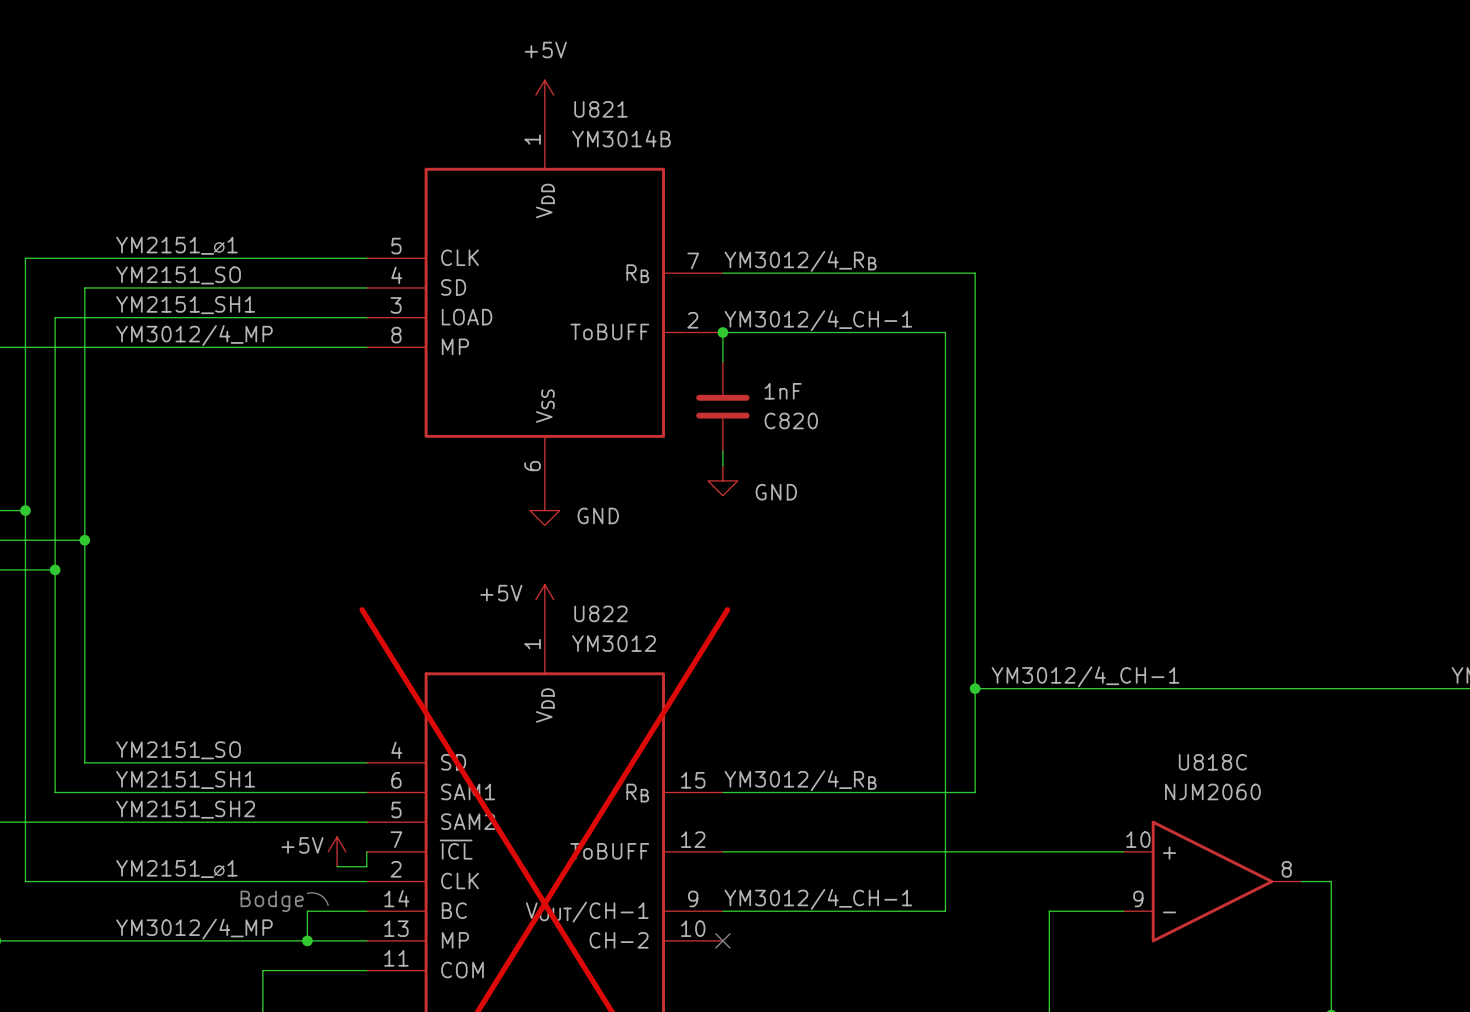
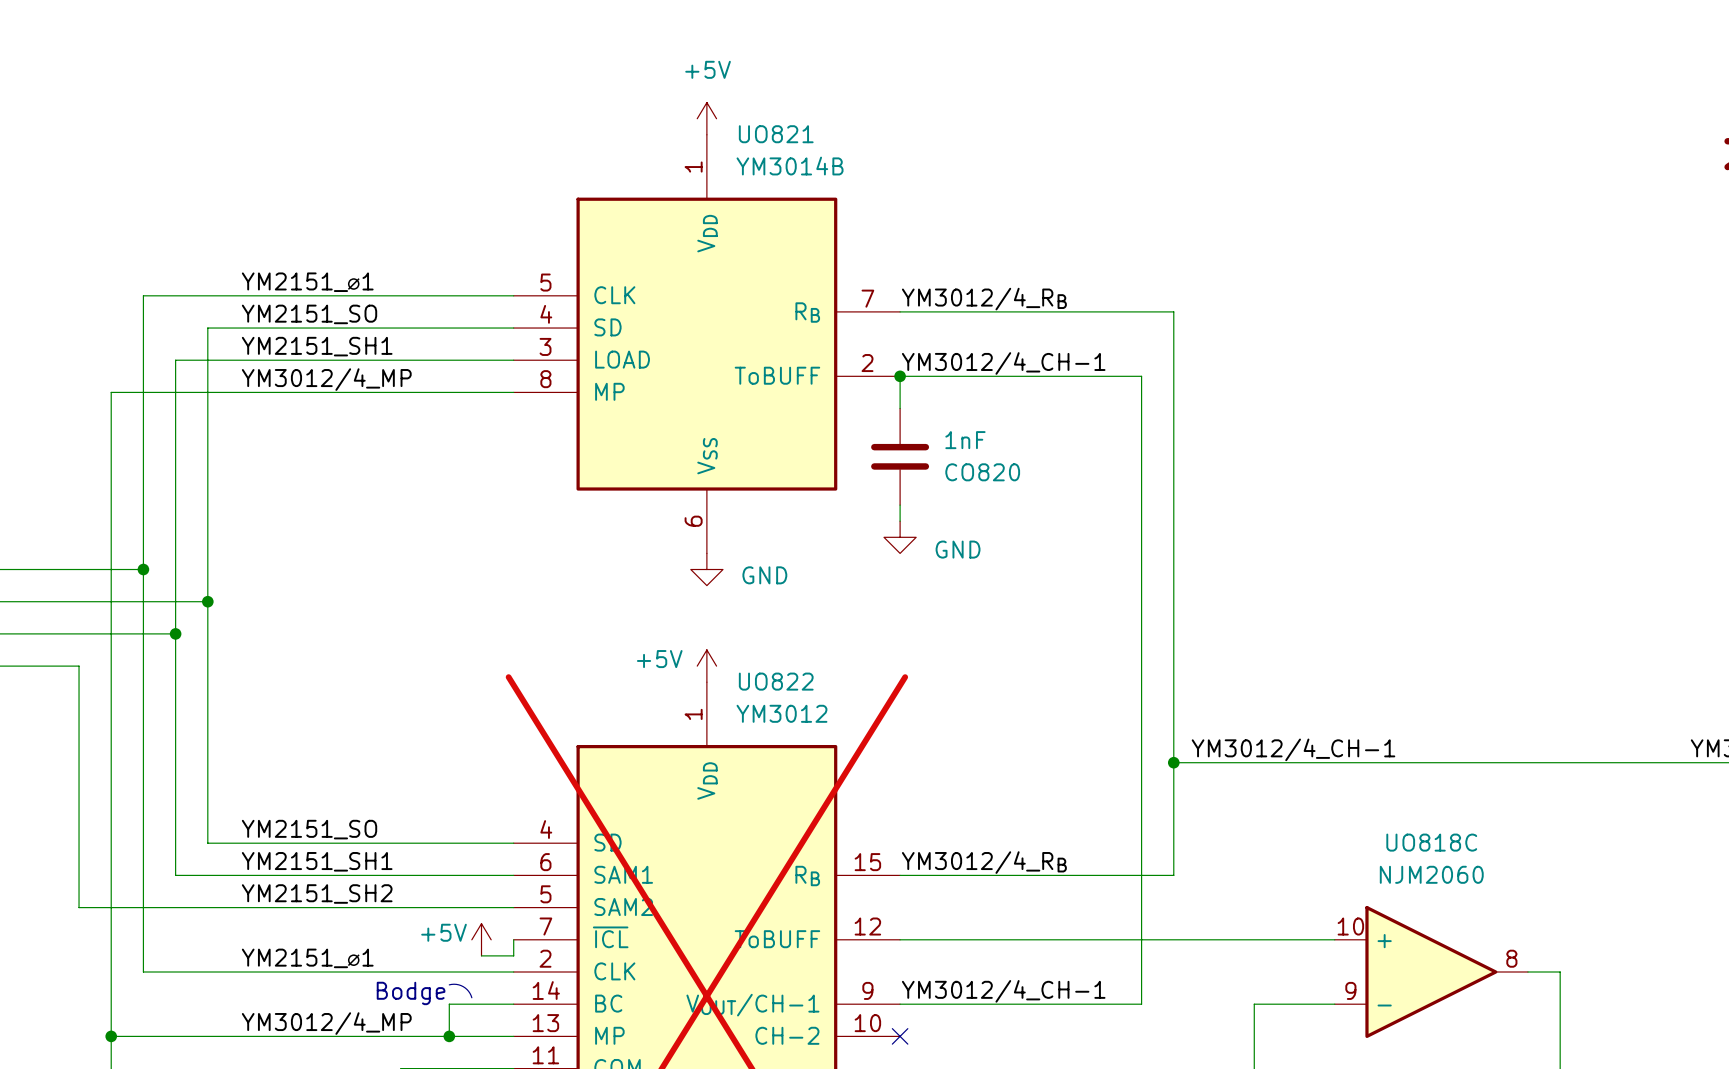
U821 name: U821 (600, 109) -> UO821 (776, 134)
C820 name: C820 (791, 420) -> CO820 (982, 472)
U822 name: U822 (600, 613) -> UO822 (776, 681)
U818C name: U818C (1212, 762) -> UO818C (1431, 842)

